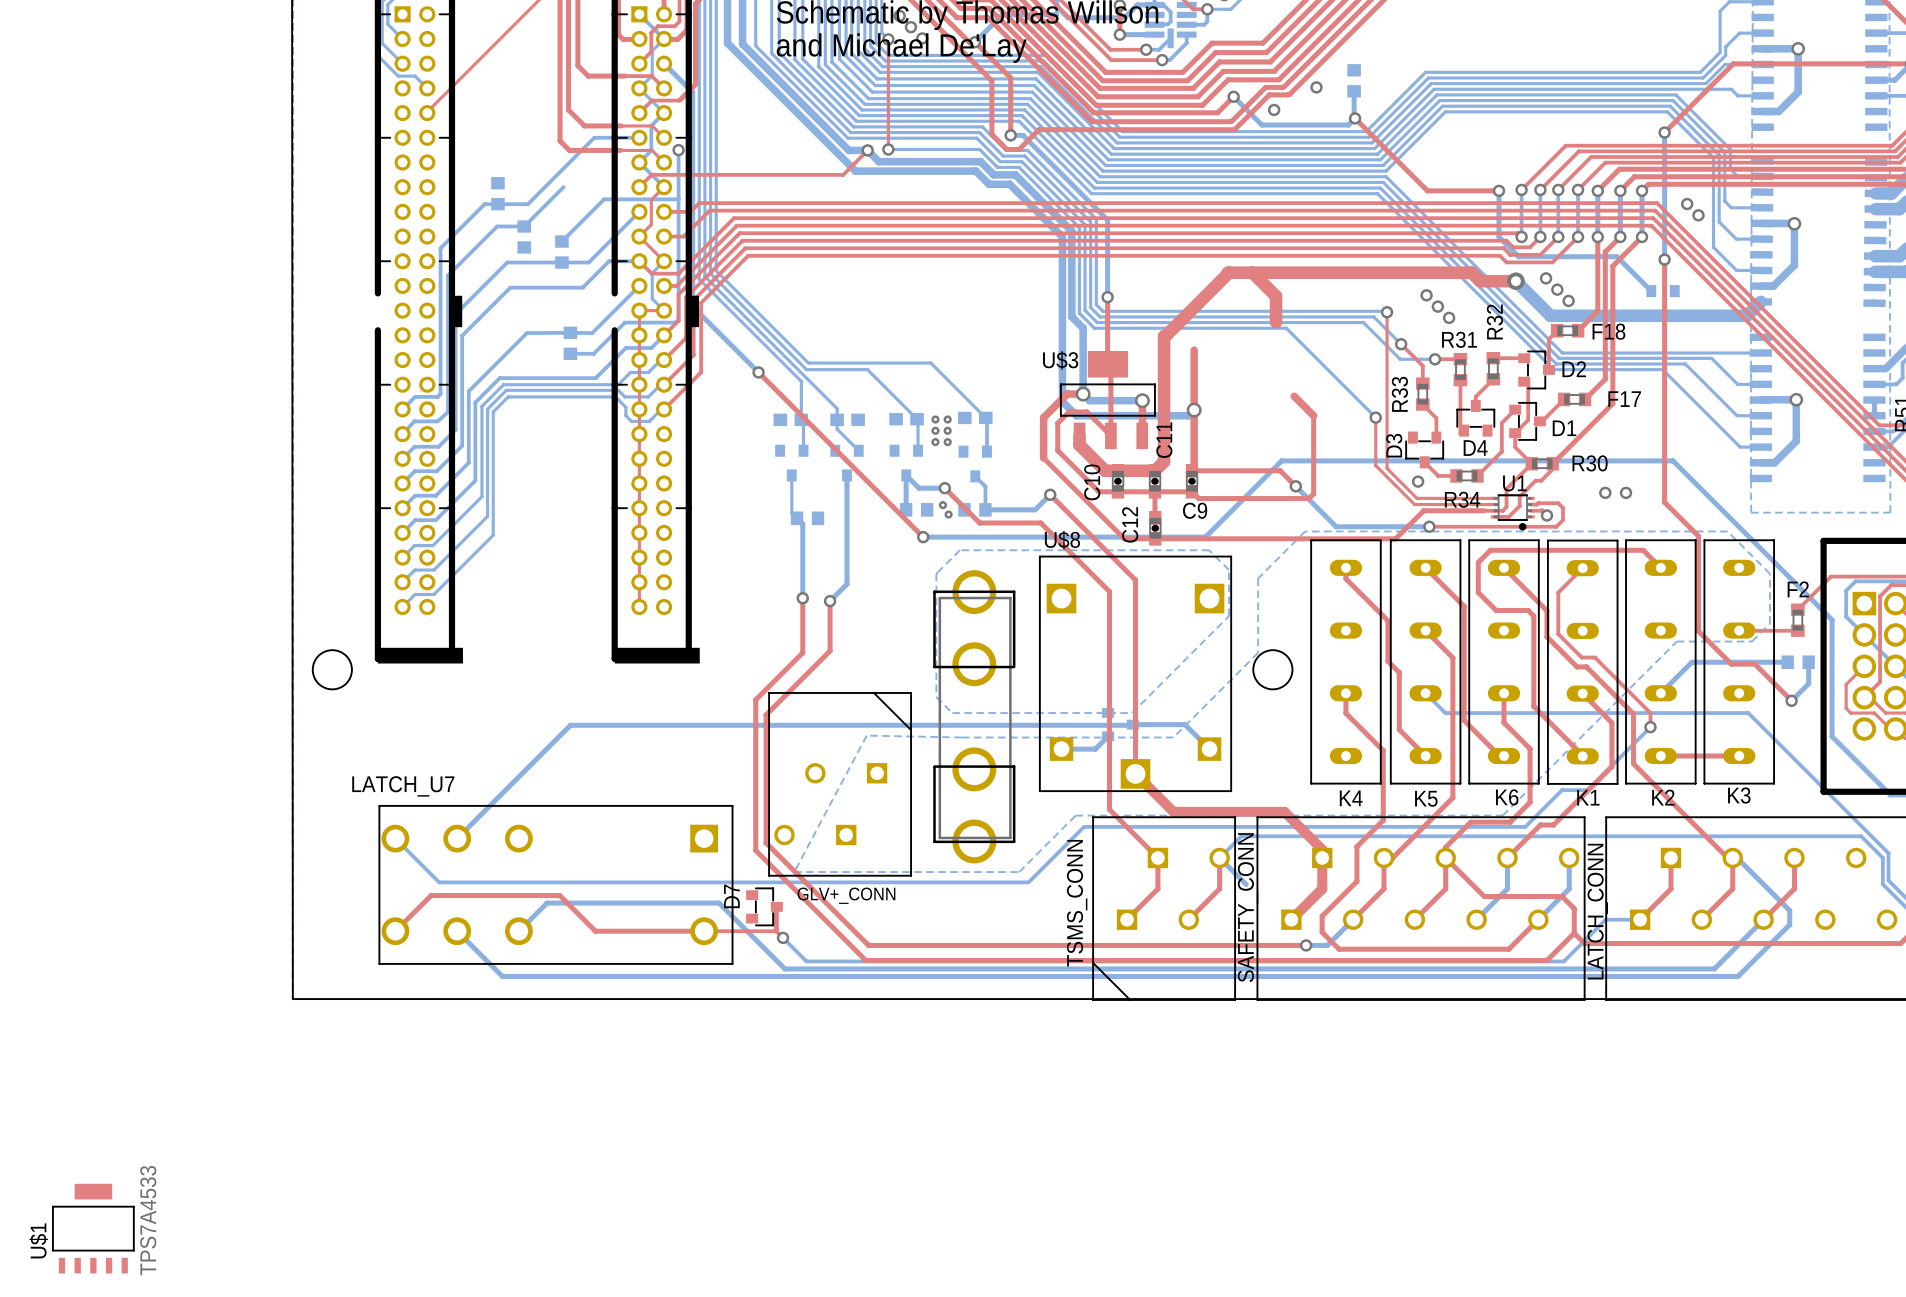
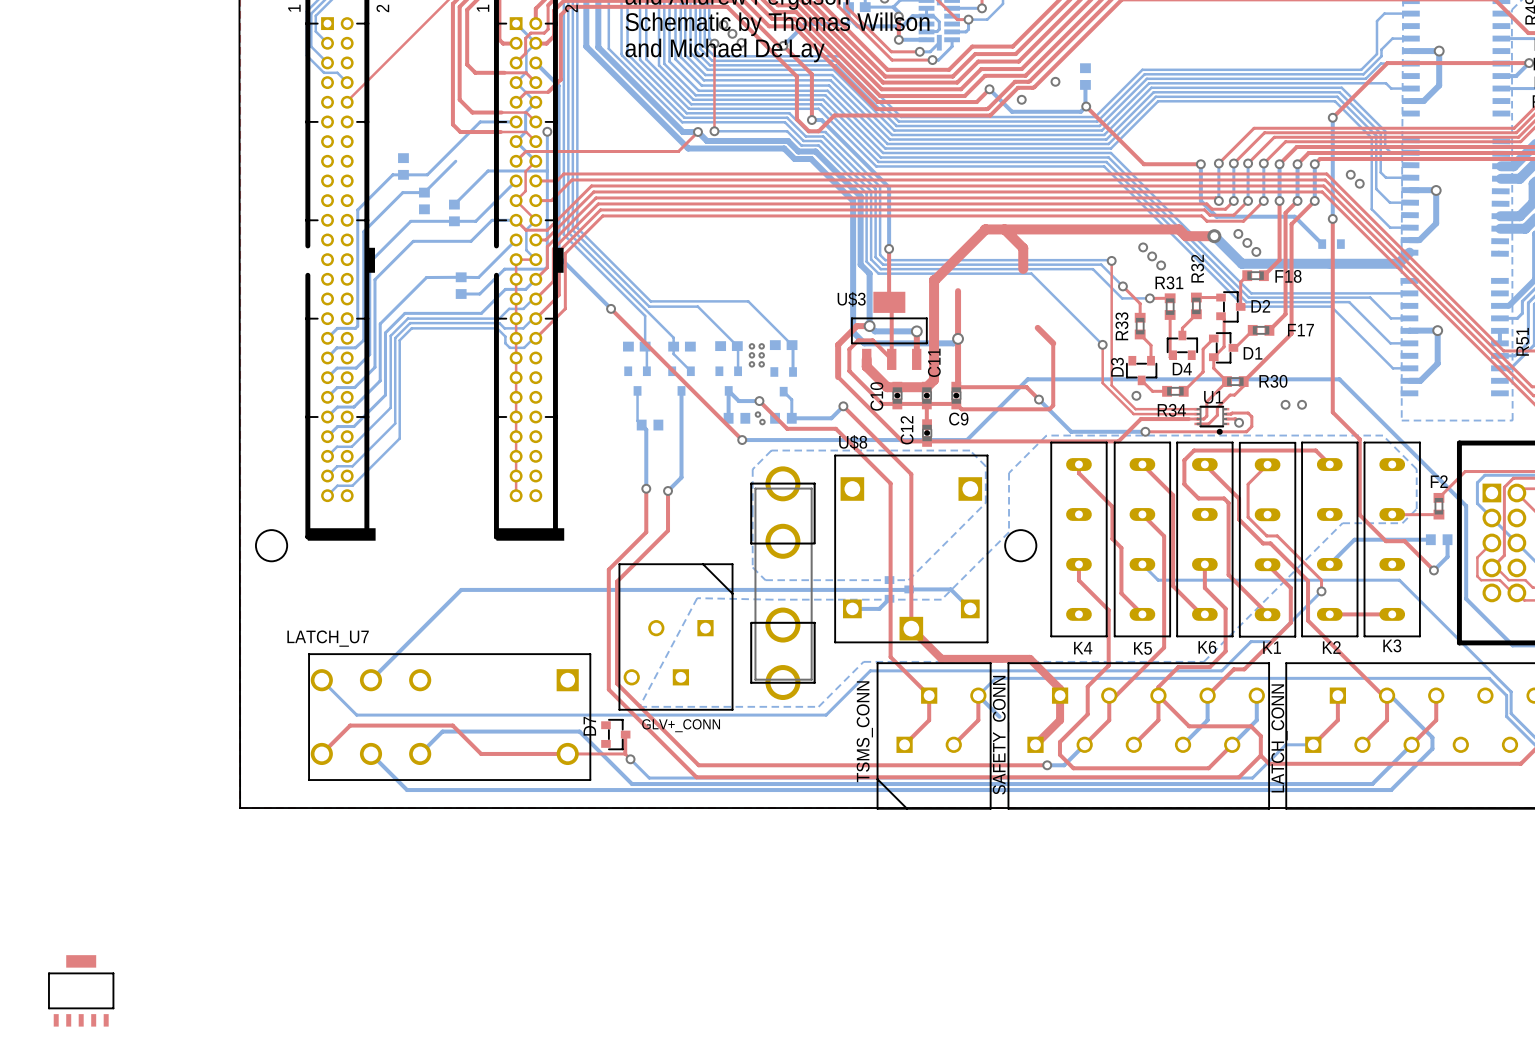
U$1 value: TPS7A4533 (148, 1220) -> none
U$1 name: U$1 (38, 1240) -> none

